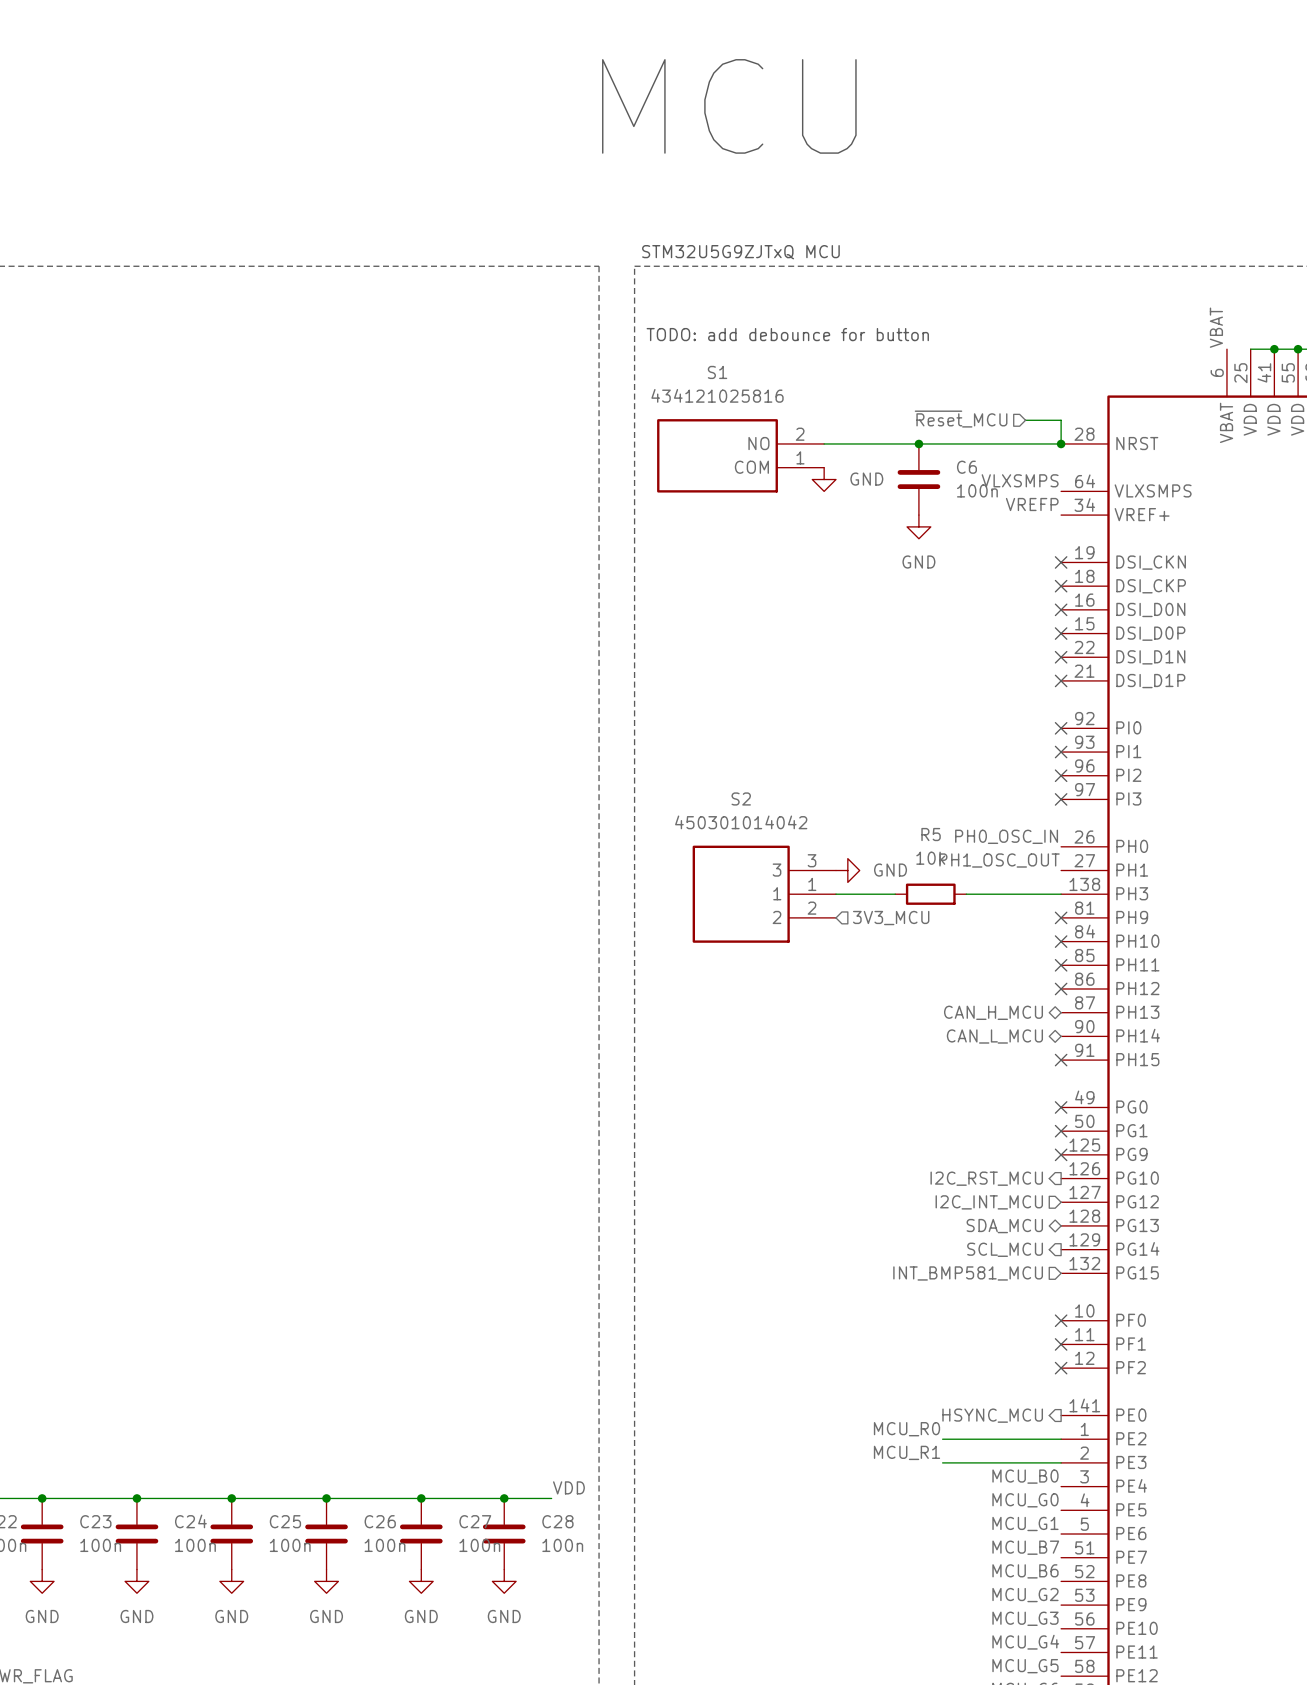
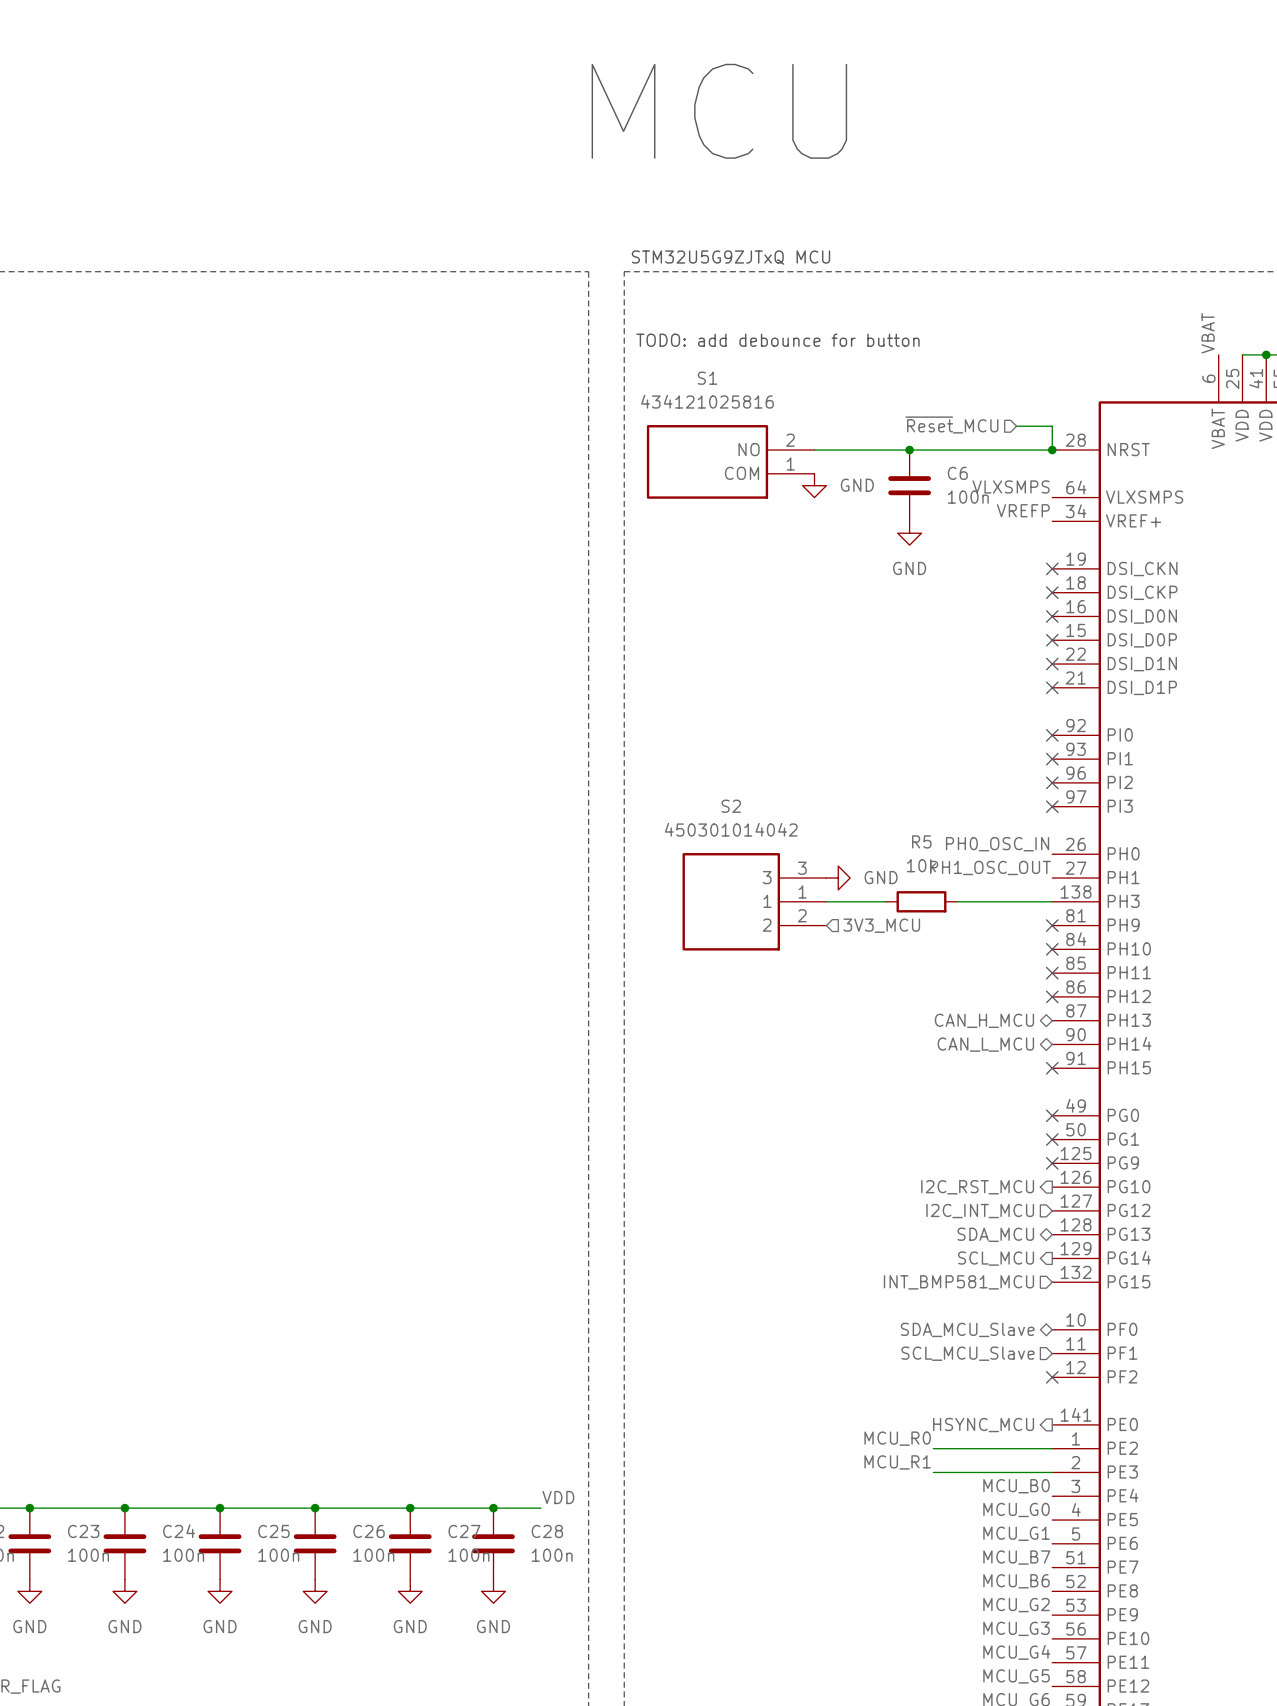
hierarchical label: none -> SDA_MCU_Slave (967, 1329)
no-connect mark: (1061, 1320) -> none
hierarchical label: none -> SCL_MCU_Slave (968, 1353)
no-connect mark: (1061, 1344) -> none

